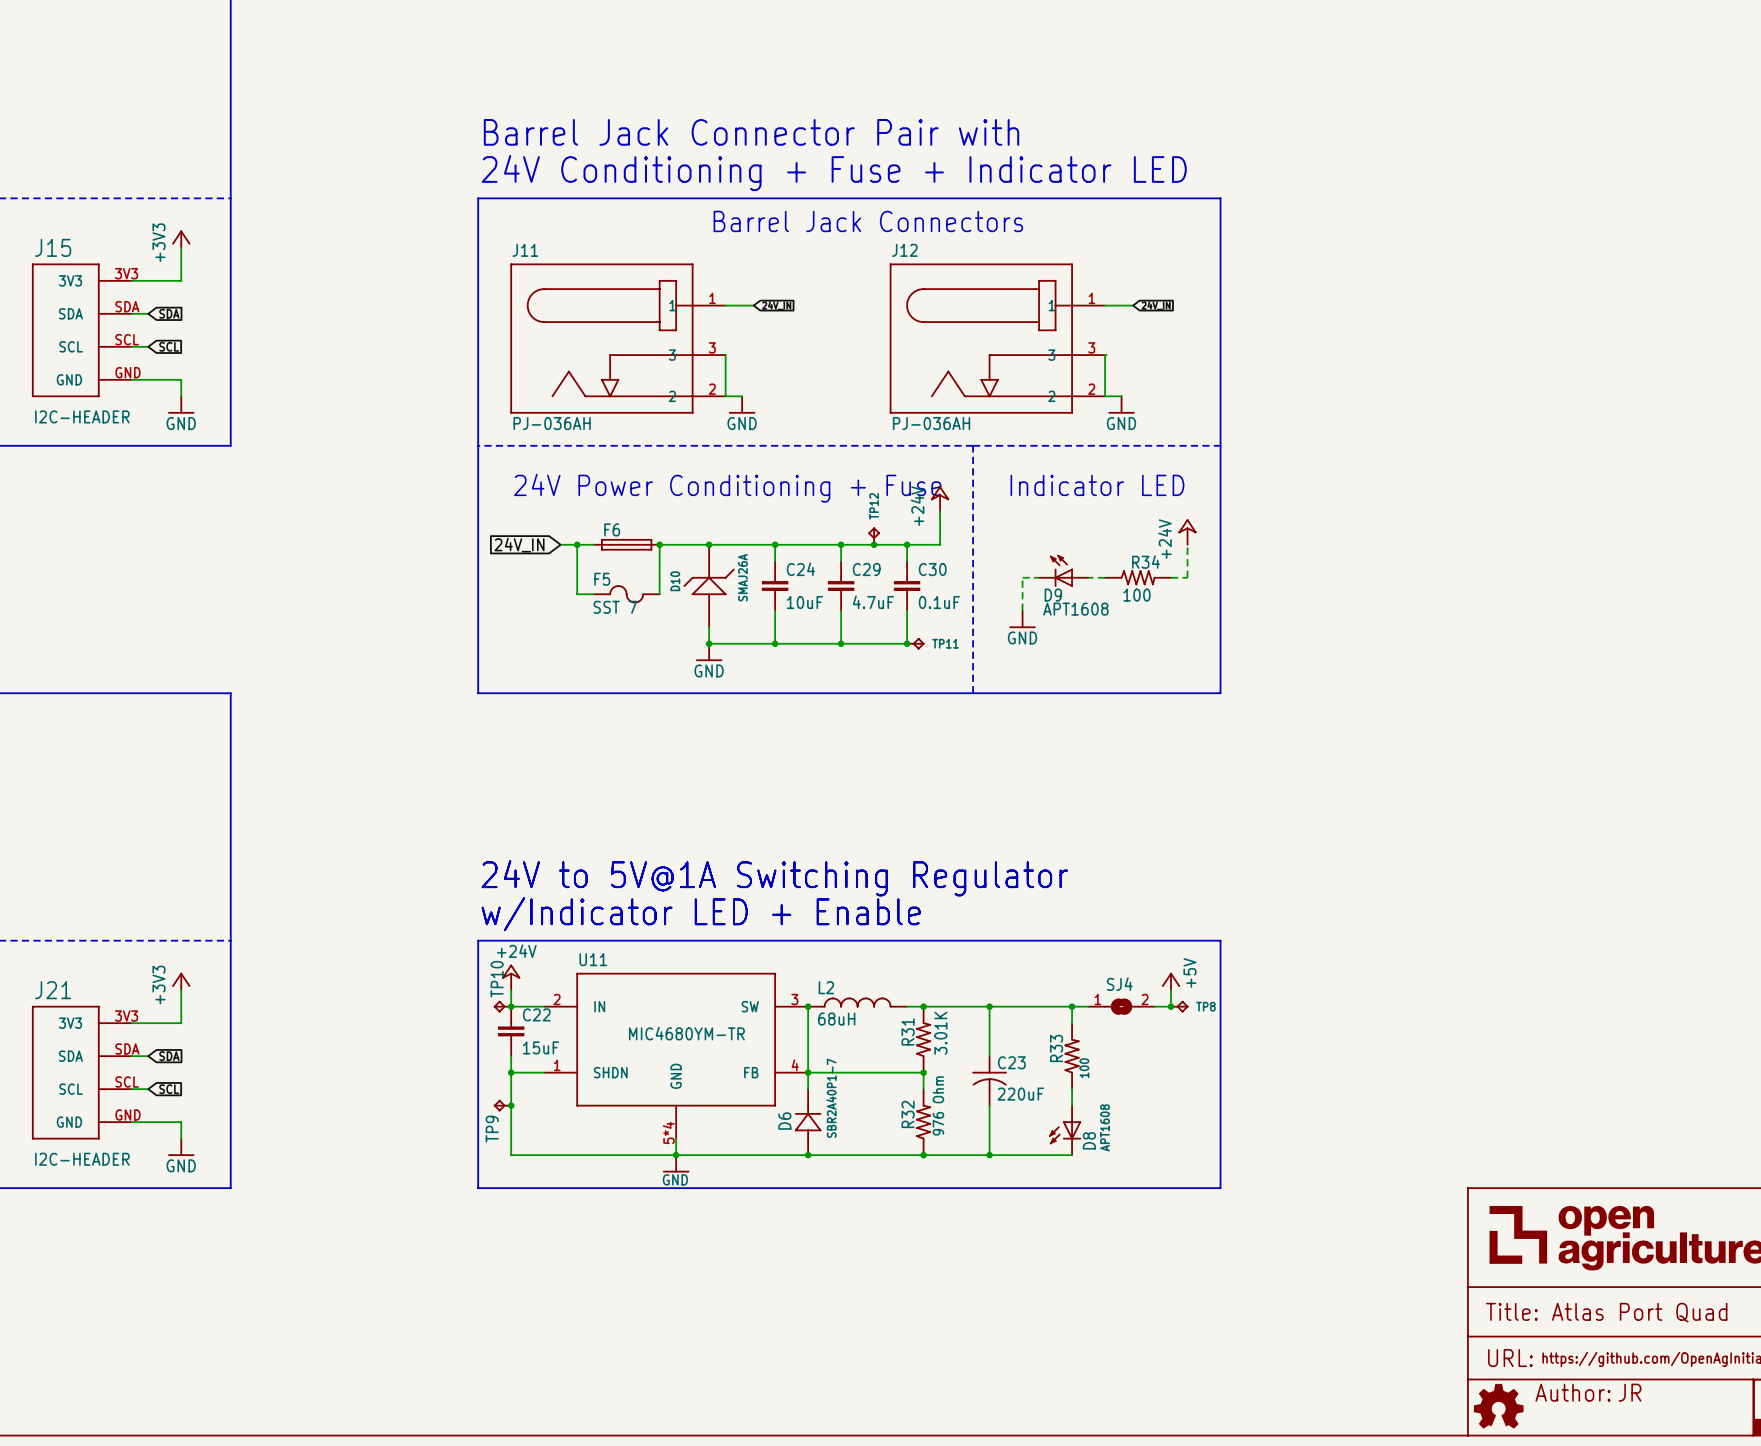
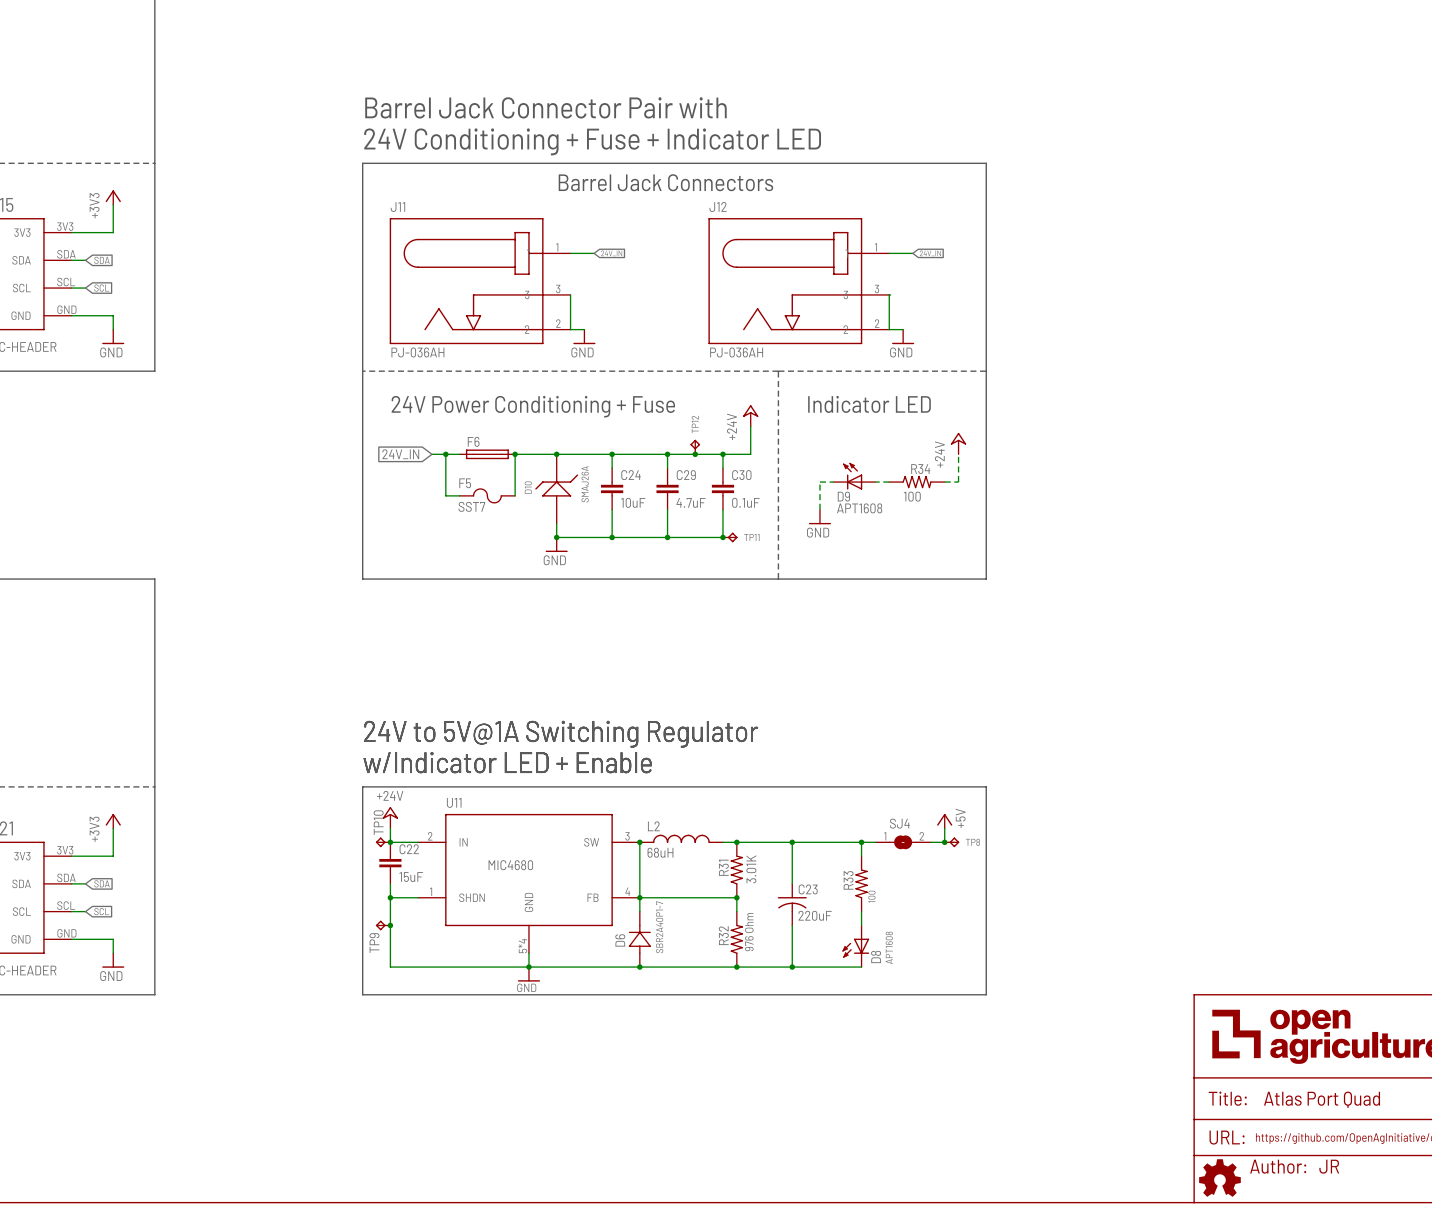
F5 value: SST 7 (615, 607) -> SST7 (471, 506)
U11 value: MIC4680YM-TR (686, 1033) -> MIC4680 (510, 865)

